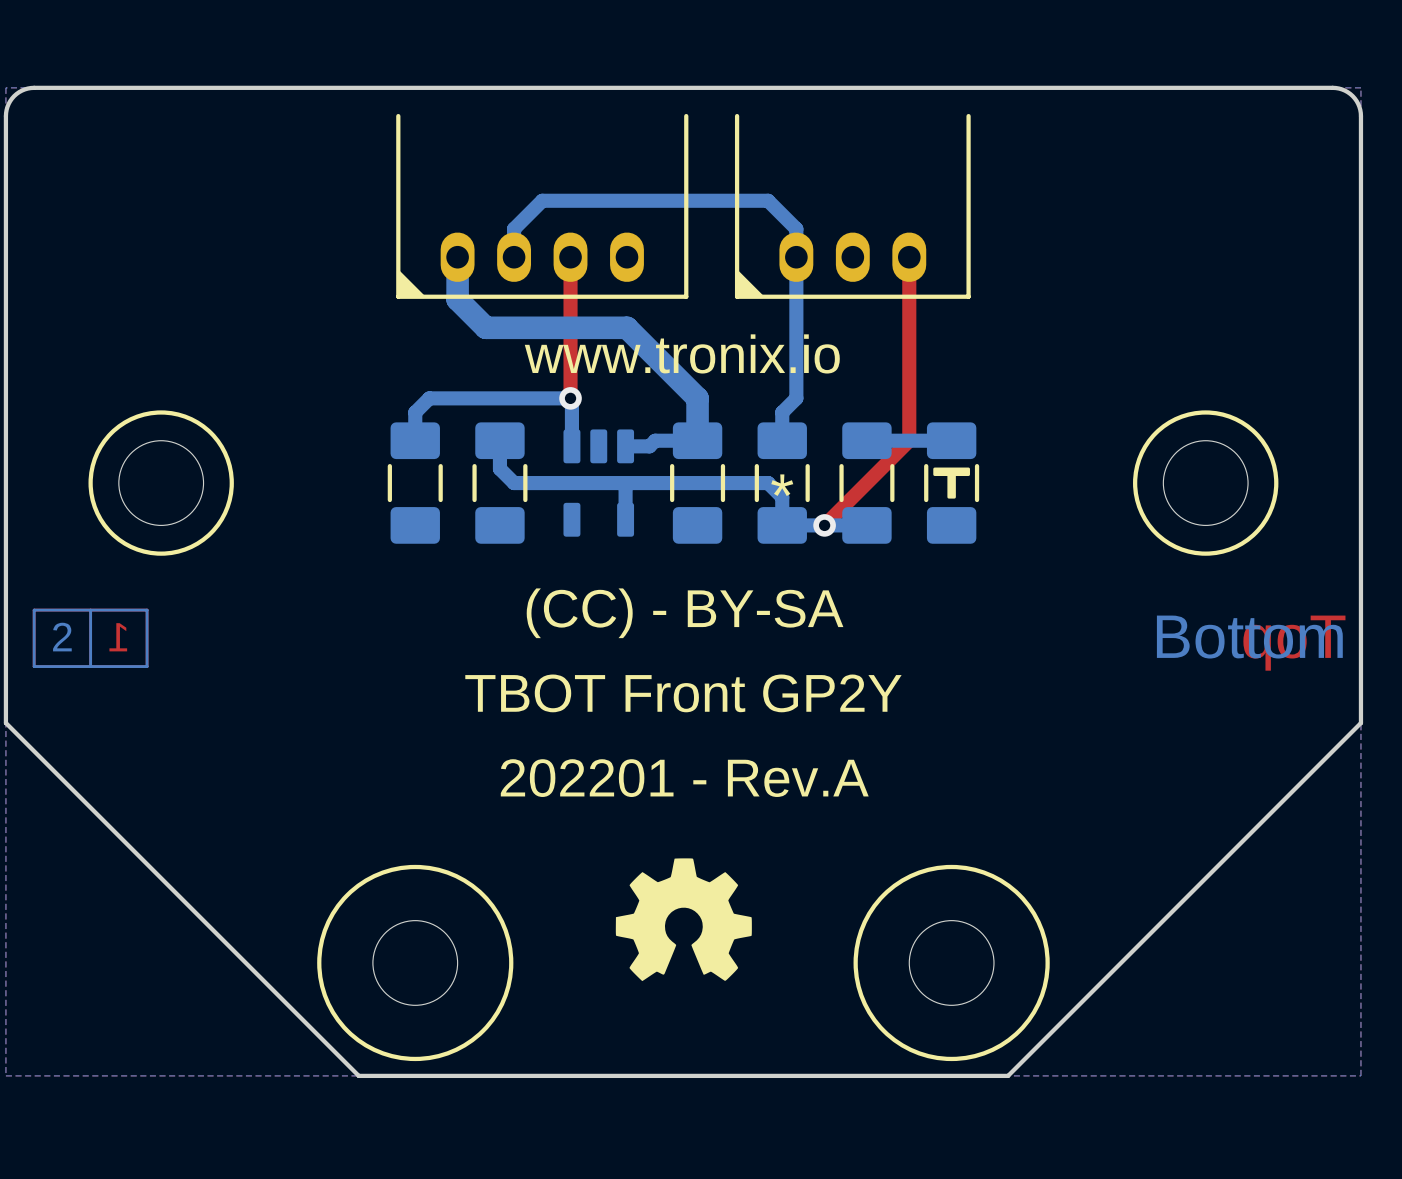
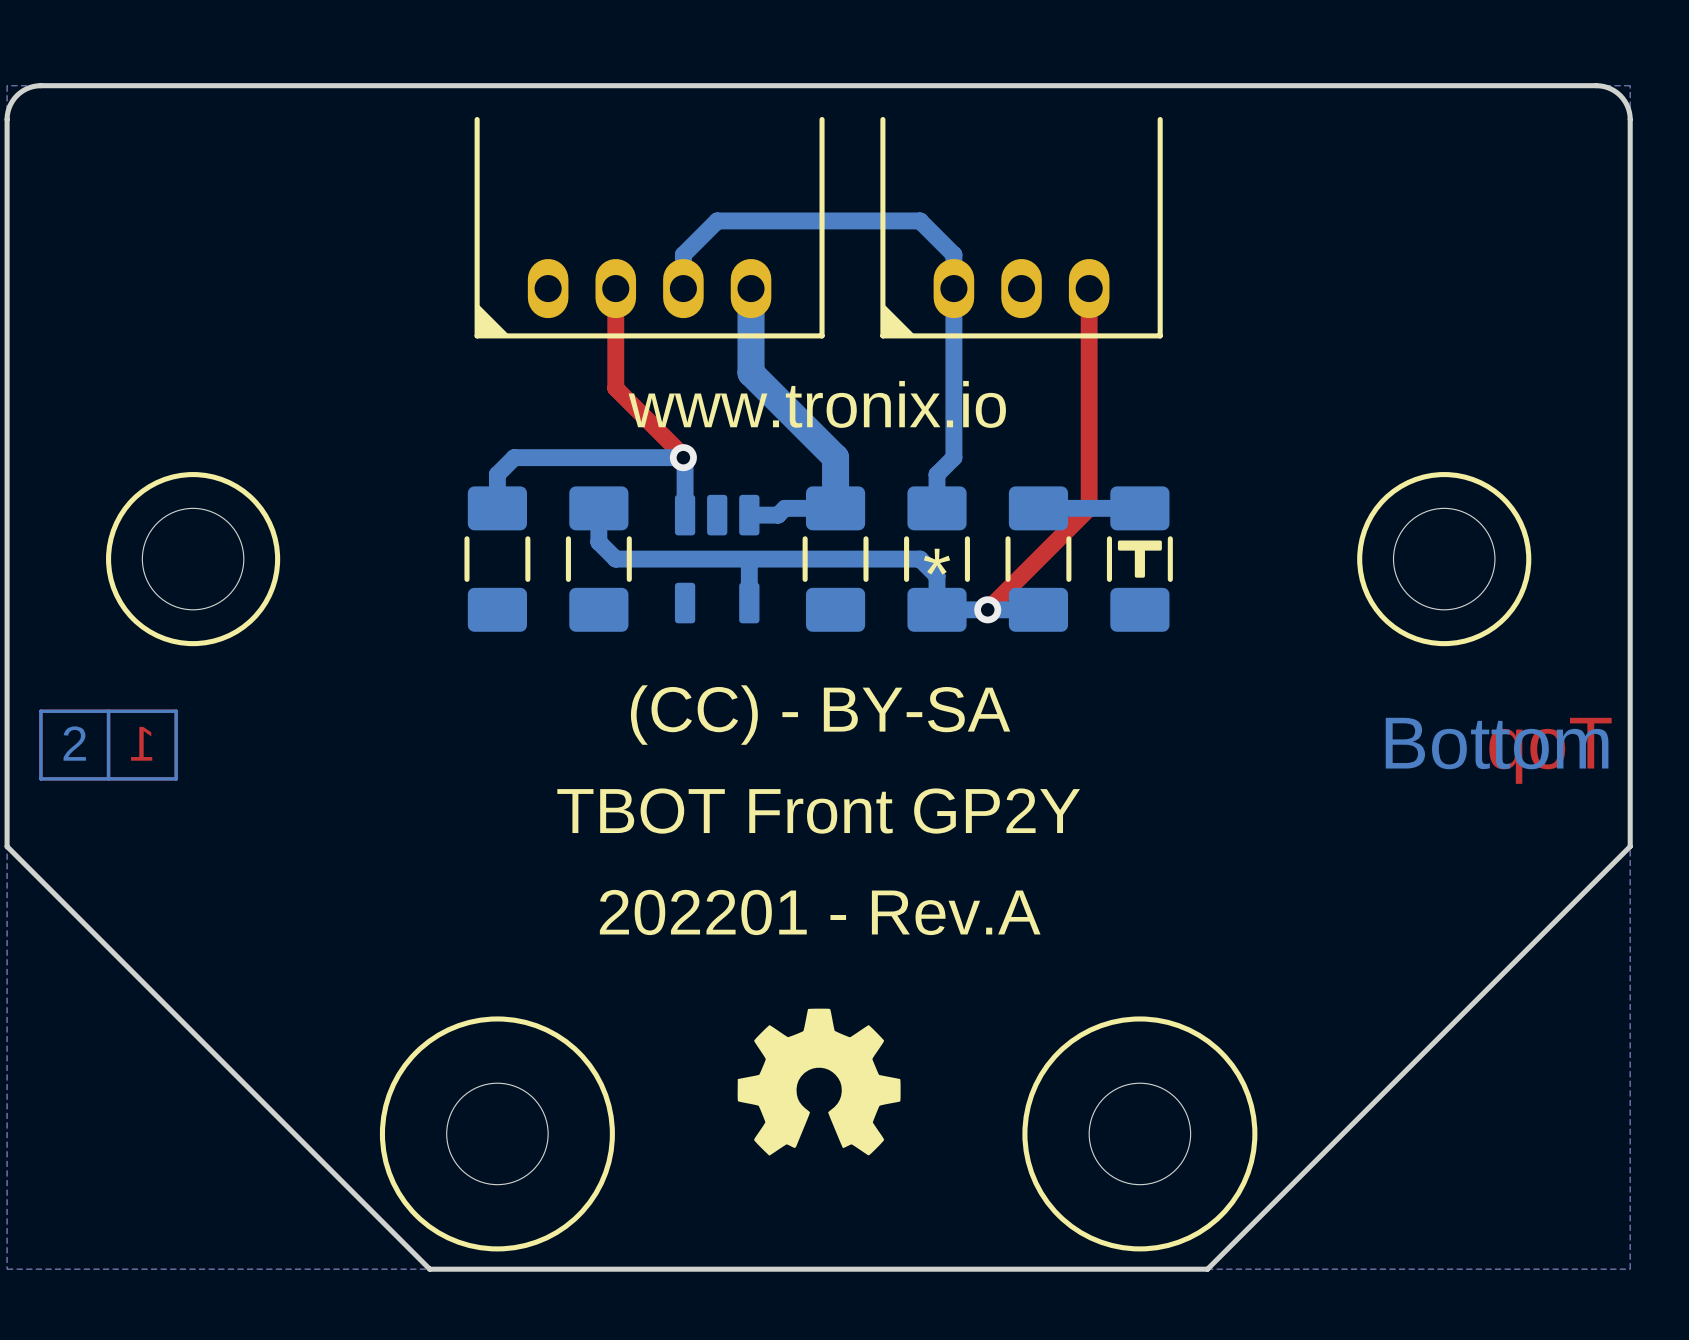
bottom track: (598, 200) (542, 200) (514, 228) (514, 257) -> (717, 220) (683, 254) (683, 288)
bottom track: (457, 257) (457, 299) (485, 327) (626, 327) -> (751, 288) (751, 373)
top track: none -> (615, 288) (615, 388) (685, 457)
top track: (570, 257) (570, 398) -> none

